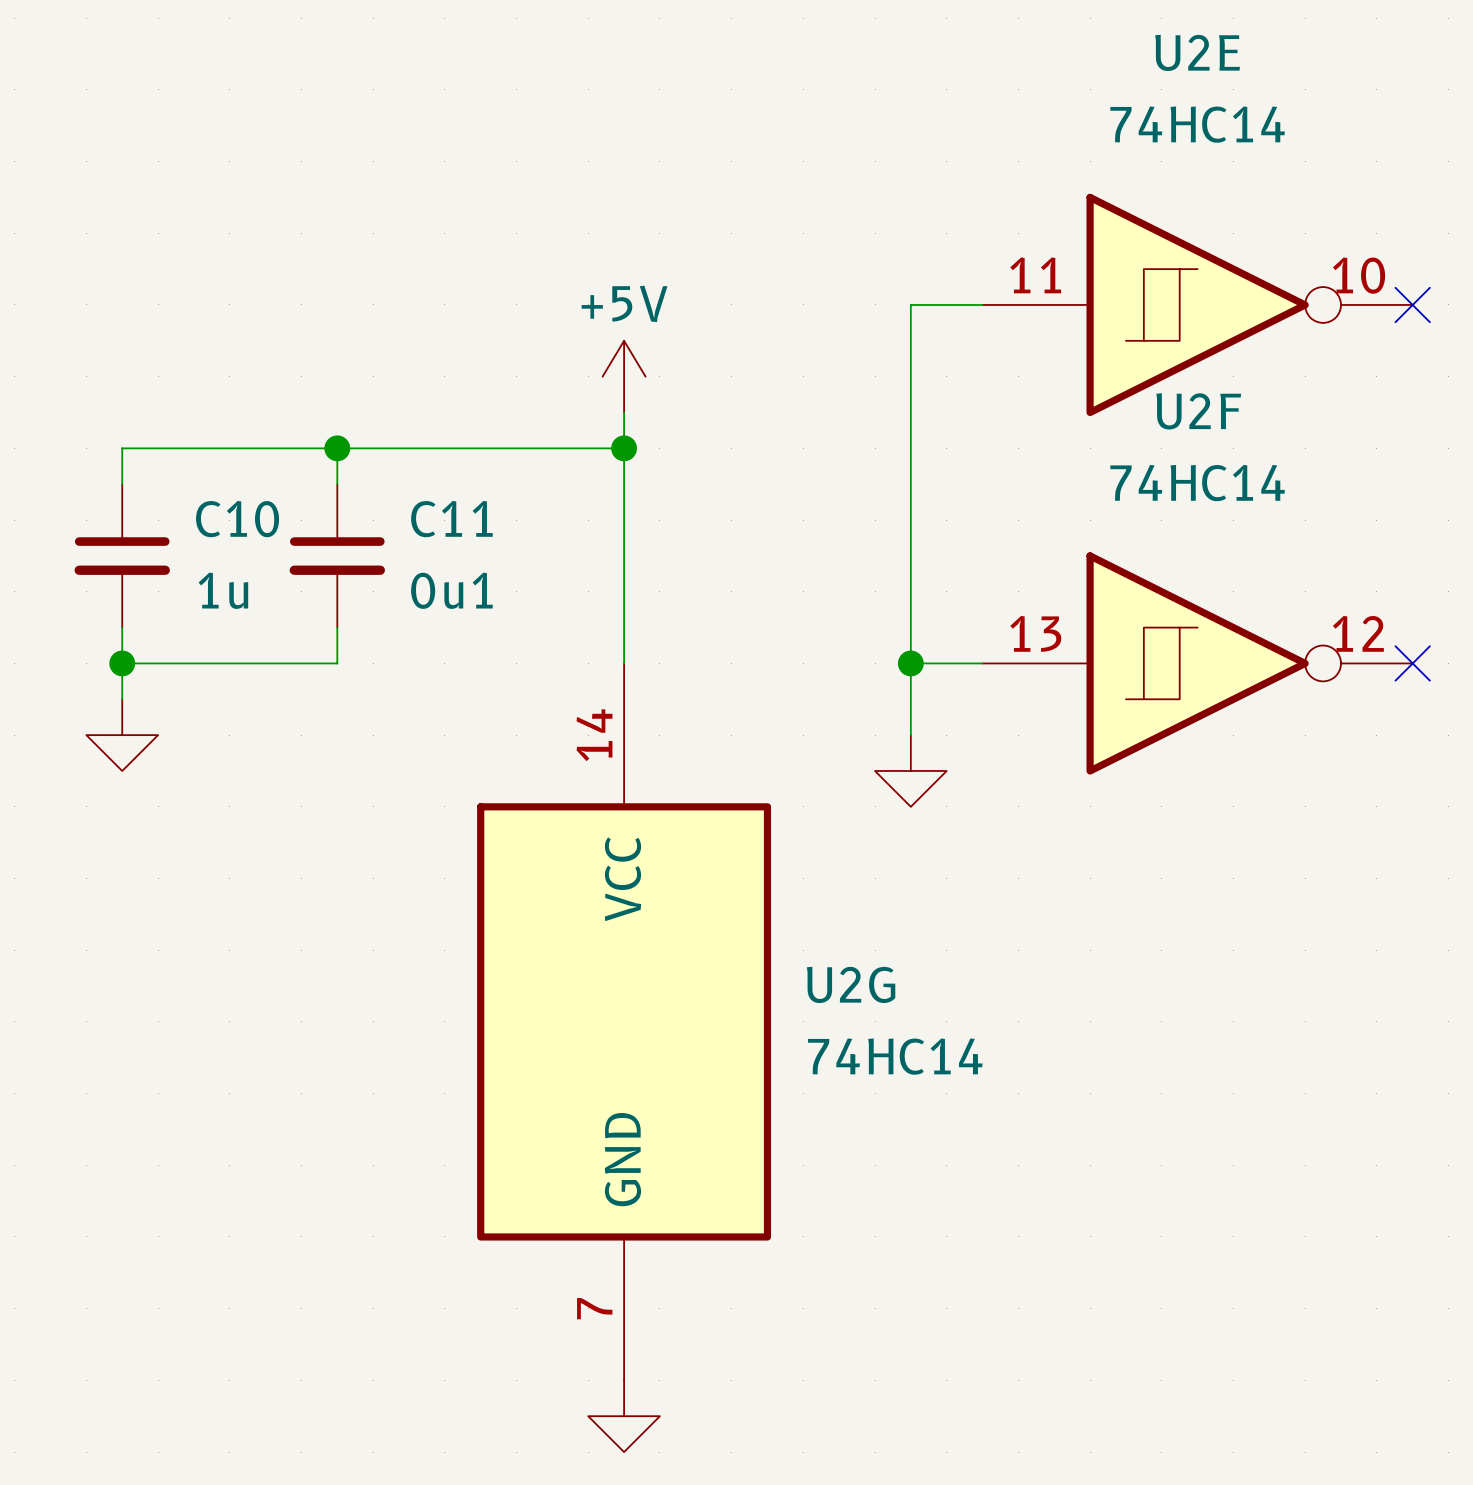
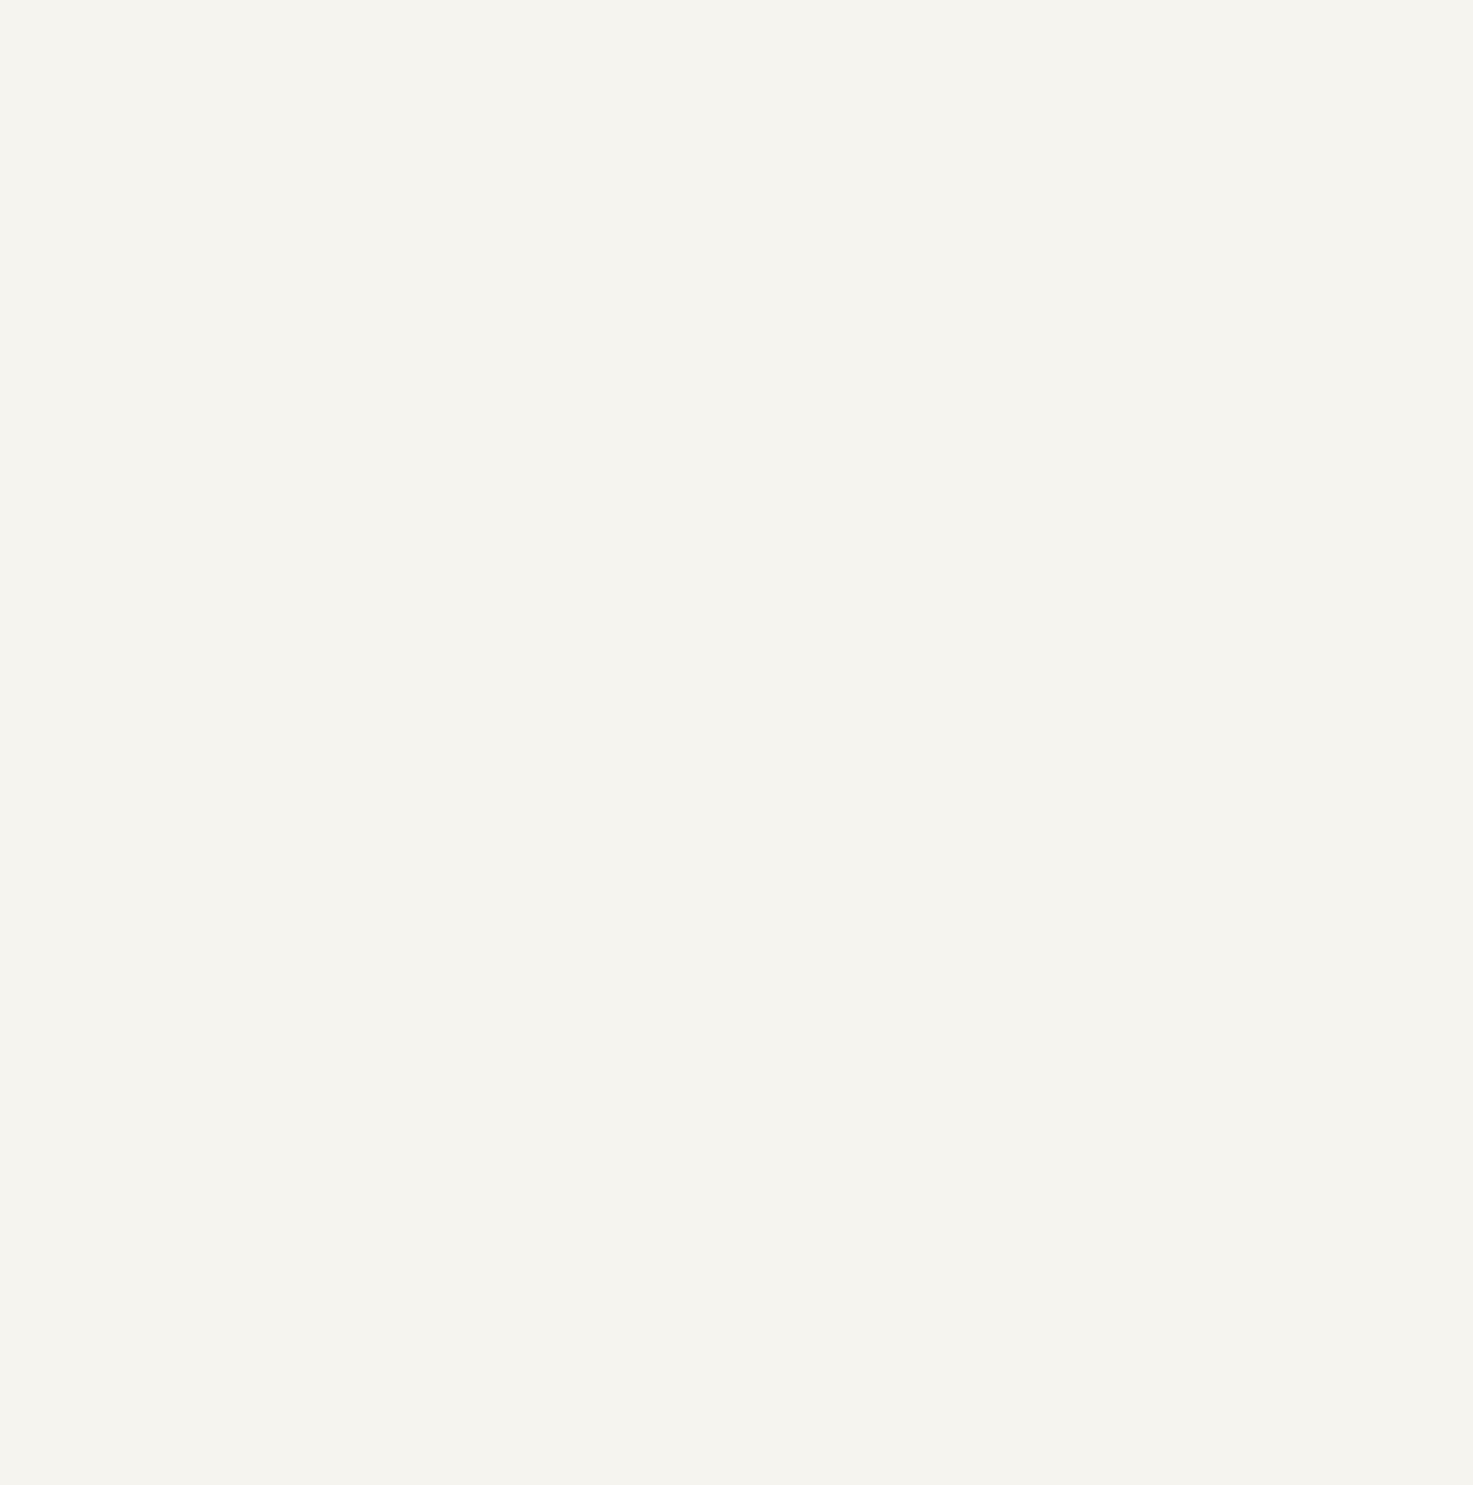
wire: (982, 304) (910, 304) (910, 735) -> none
U2E: 74HC14 (1197, 304) -> none
no-connect mark: (1412, 304) -> none
power symbol: +5V (624, 376) -> none
wire: (624, 412) (624, 663) -> none
wire: (337, 448) (337, 484) -> none
junction: (337, 448) -> none
wire: (624, 448) (122, 448) (122, 484) -> none
junction: (624, 448) -> none
C10: 1u (122, 555) -> none
C11: 0u1 (337, 555) -> none
wire: (122, 627) (122, 699) -> none
wire: (337, 627) (337, 663) (122, 663) -> none
junction: (122, 663) -> none
wire: (910, 663) (982, 663) -> none
junction: (910, 663) -> none
U2F: 74HC14 (1197, 663) -> none
no-connect mark: (1412, 663) -> none
power symbol: (122, 735) -> none
power symbol: (910, 770) -> none
U2G: 74HC14 (624, 1021) -> none
power symbol: (624, 1416) -> none

